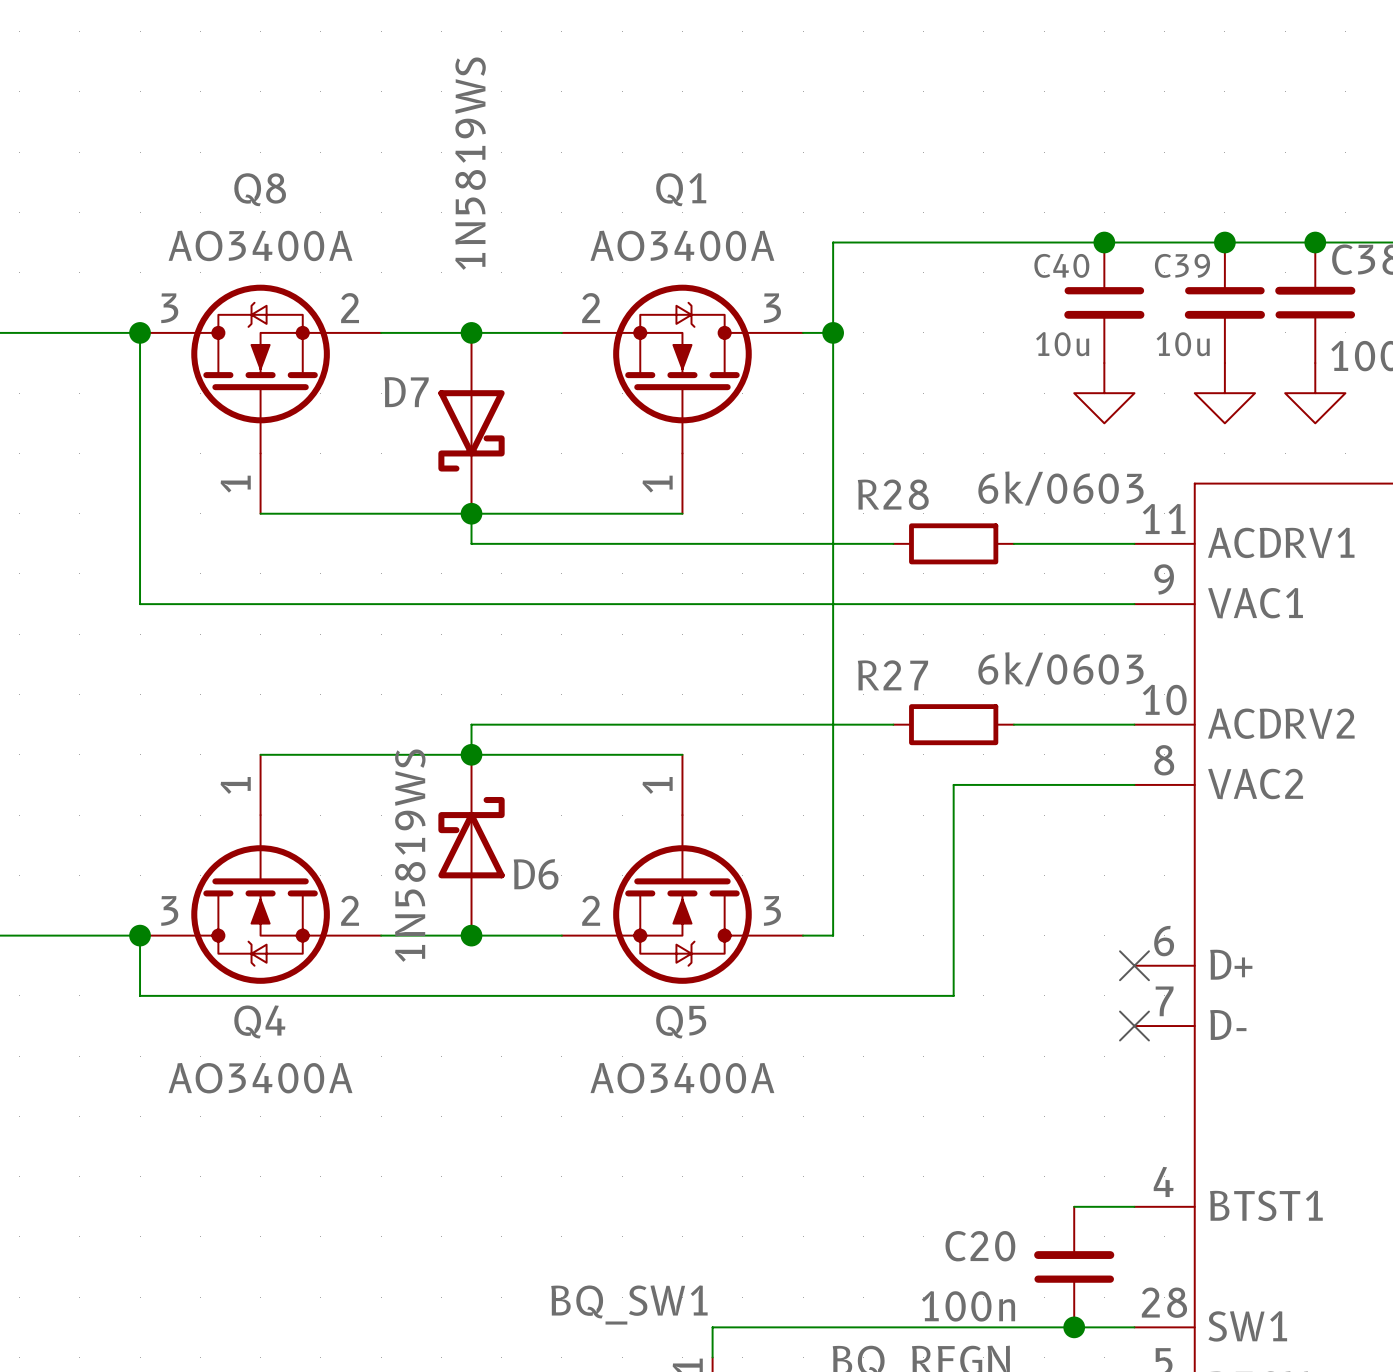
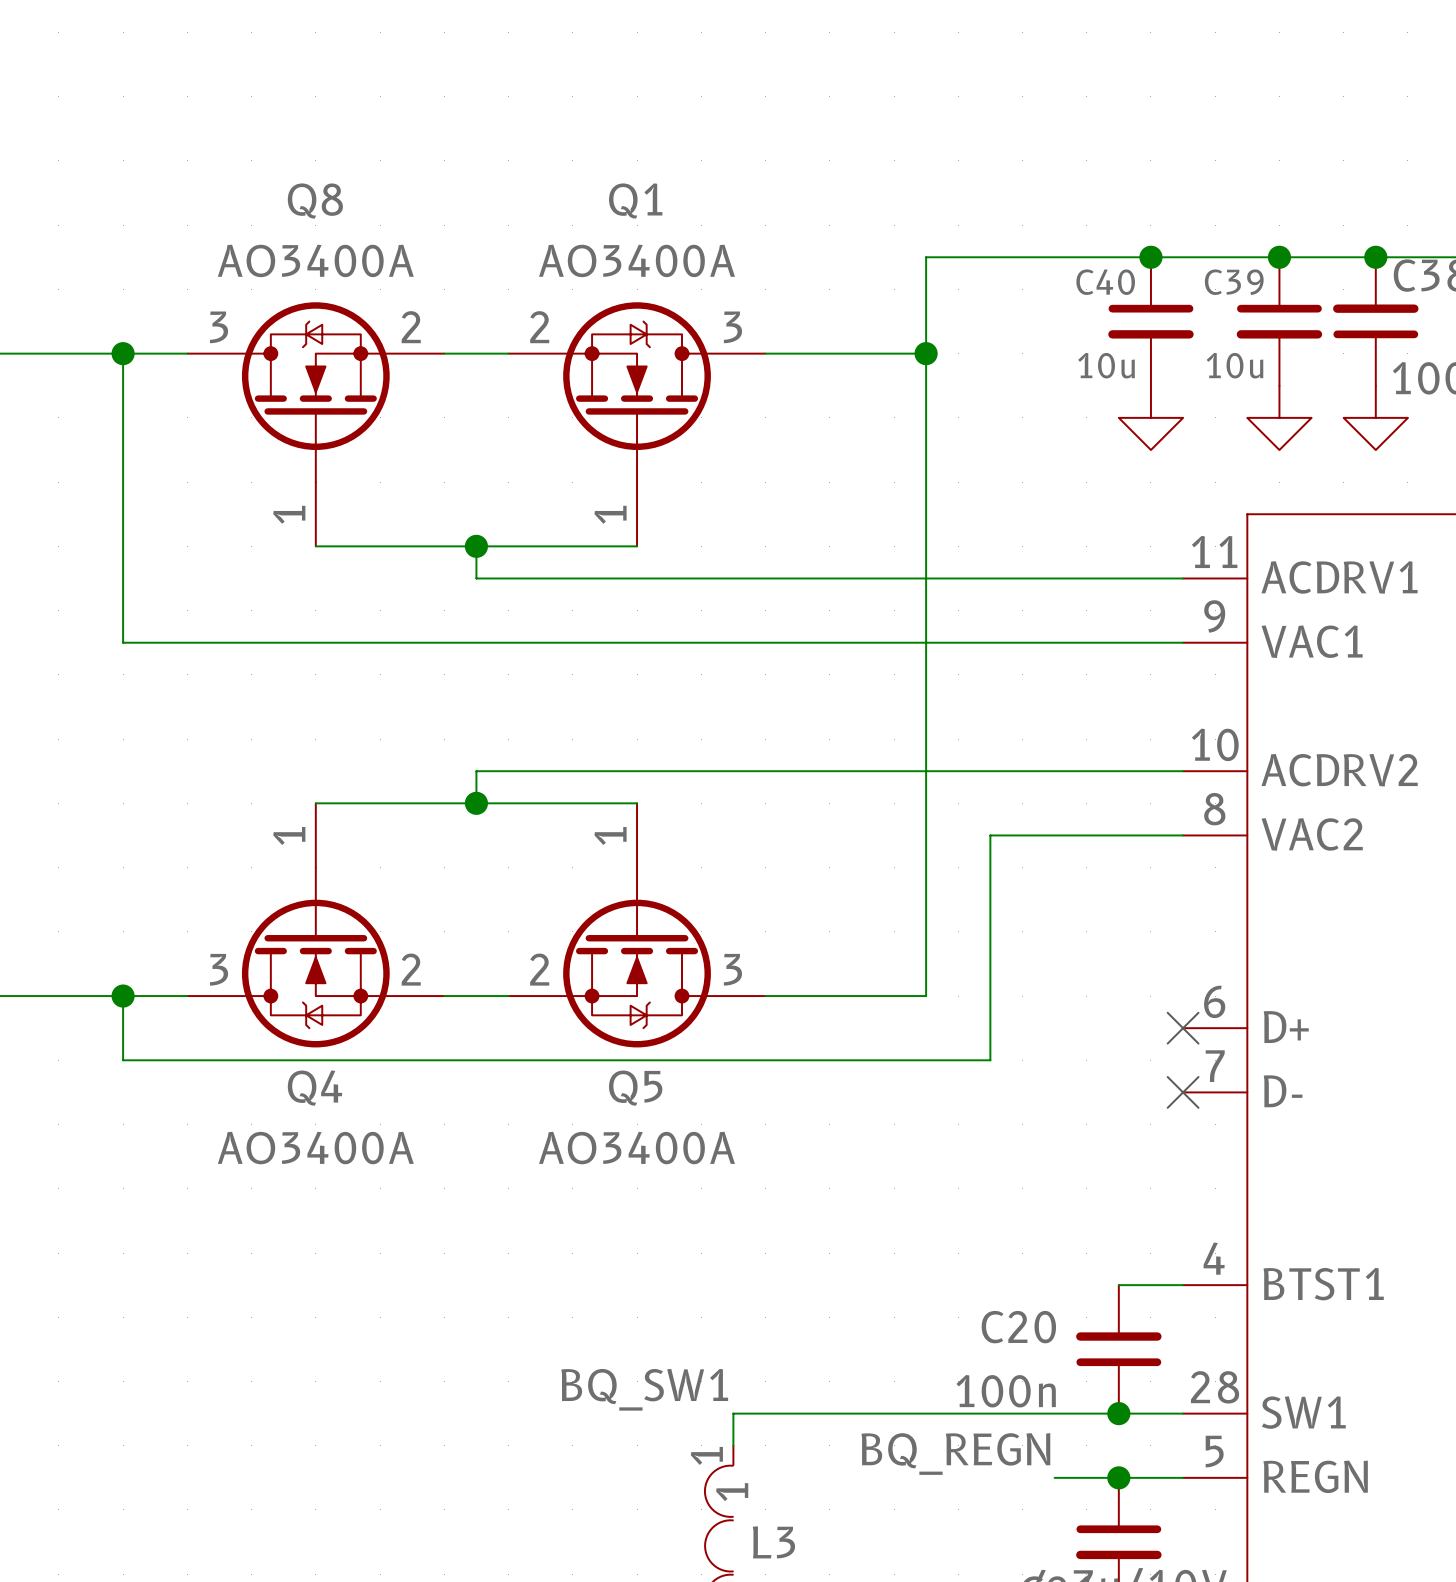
wire: (893, 242) (833, 242) (833, 935) -> (926, 257) (926, 996) (861, 996)
junction: (471, 332) -> none
junction position: (833, 332) -> (926, 353)
Q8 position: (260, 399) -> (315, 424)
Q1 position: (682, 399) -> (637, 424)
D7: 1N5819WS (471, 423) -> none
wire: (260, 513) (320, 513) -> none
wire: (622, 513) (682, 513) -> (861, 353) (926, 353)
wire: none -> (926, 578) (1054, 578)
R28: 6k/0603 (953, 543) -> none
wire: none -> (926, 771) (1054, 771)
R27: 6k/0603 (953, 724) -> none
wire: (260, 754) (320, 754) -> none
wire: (622, 754) (682, 754) -> none
D6: 1N5819WS (471, 845) -> none
Q4 position: (260, 869) -> (315, 925)
Q5 position: (682, 869) -> (637, 925)
junction: (471, 935) -> none

